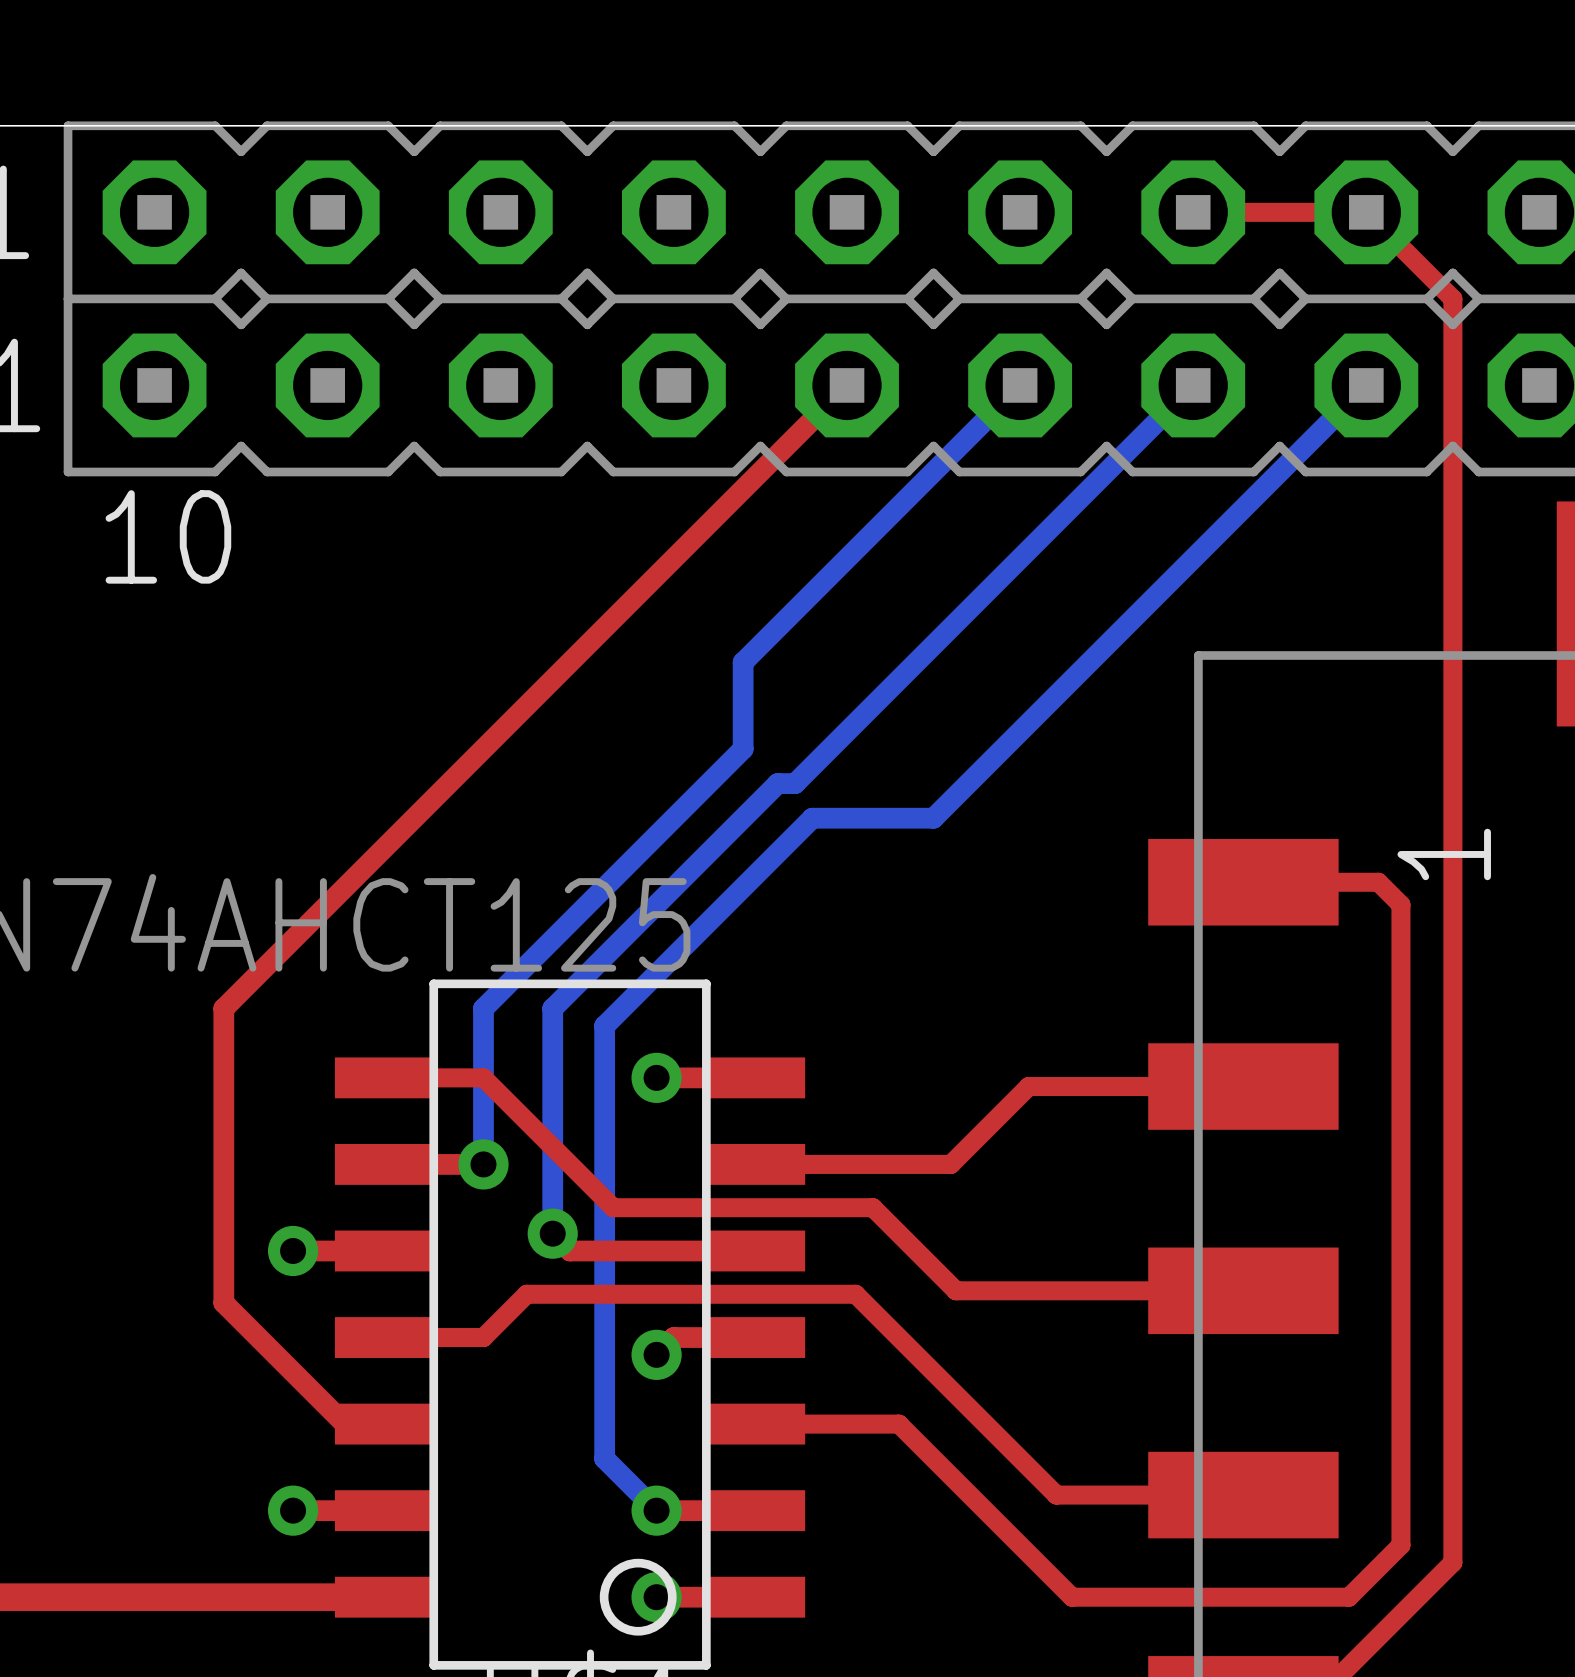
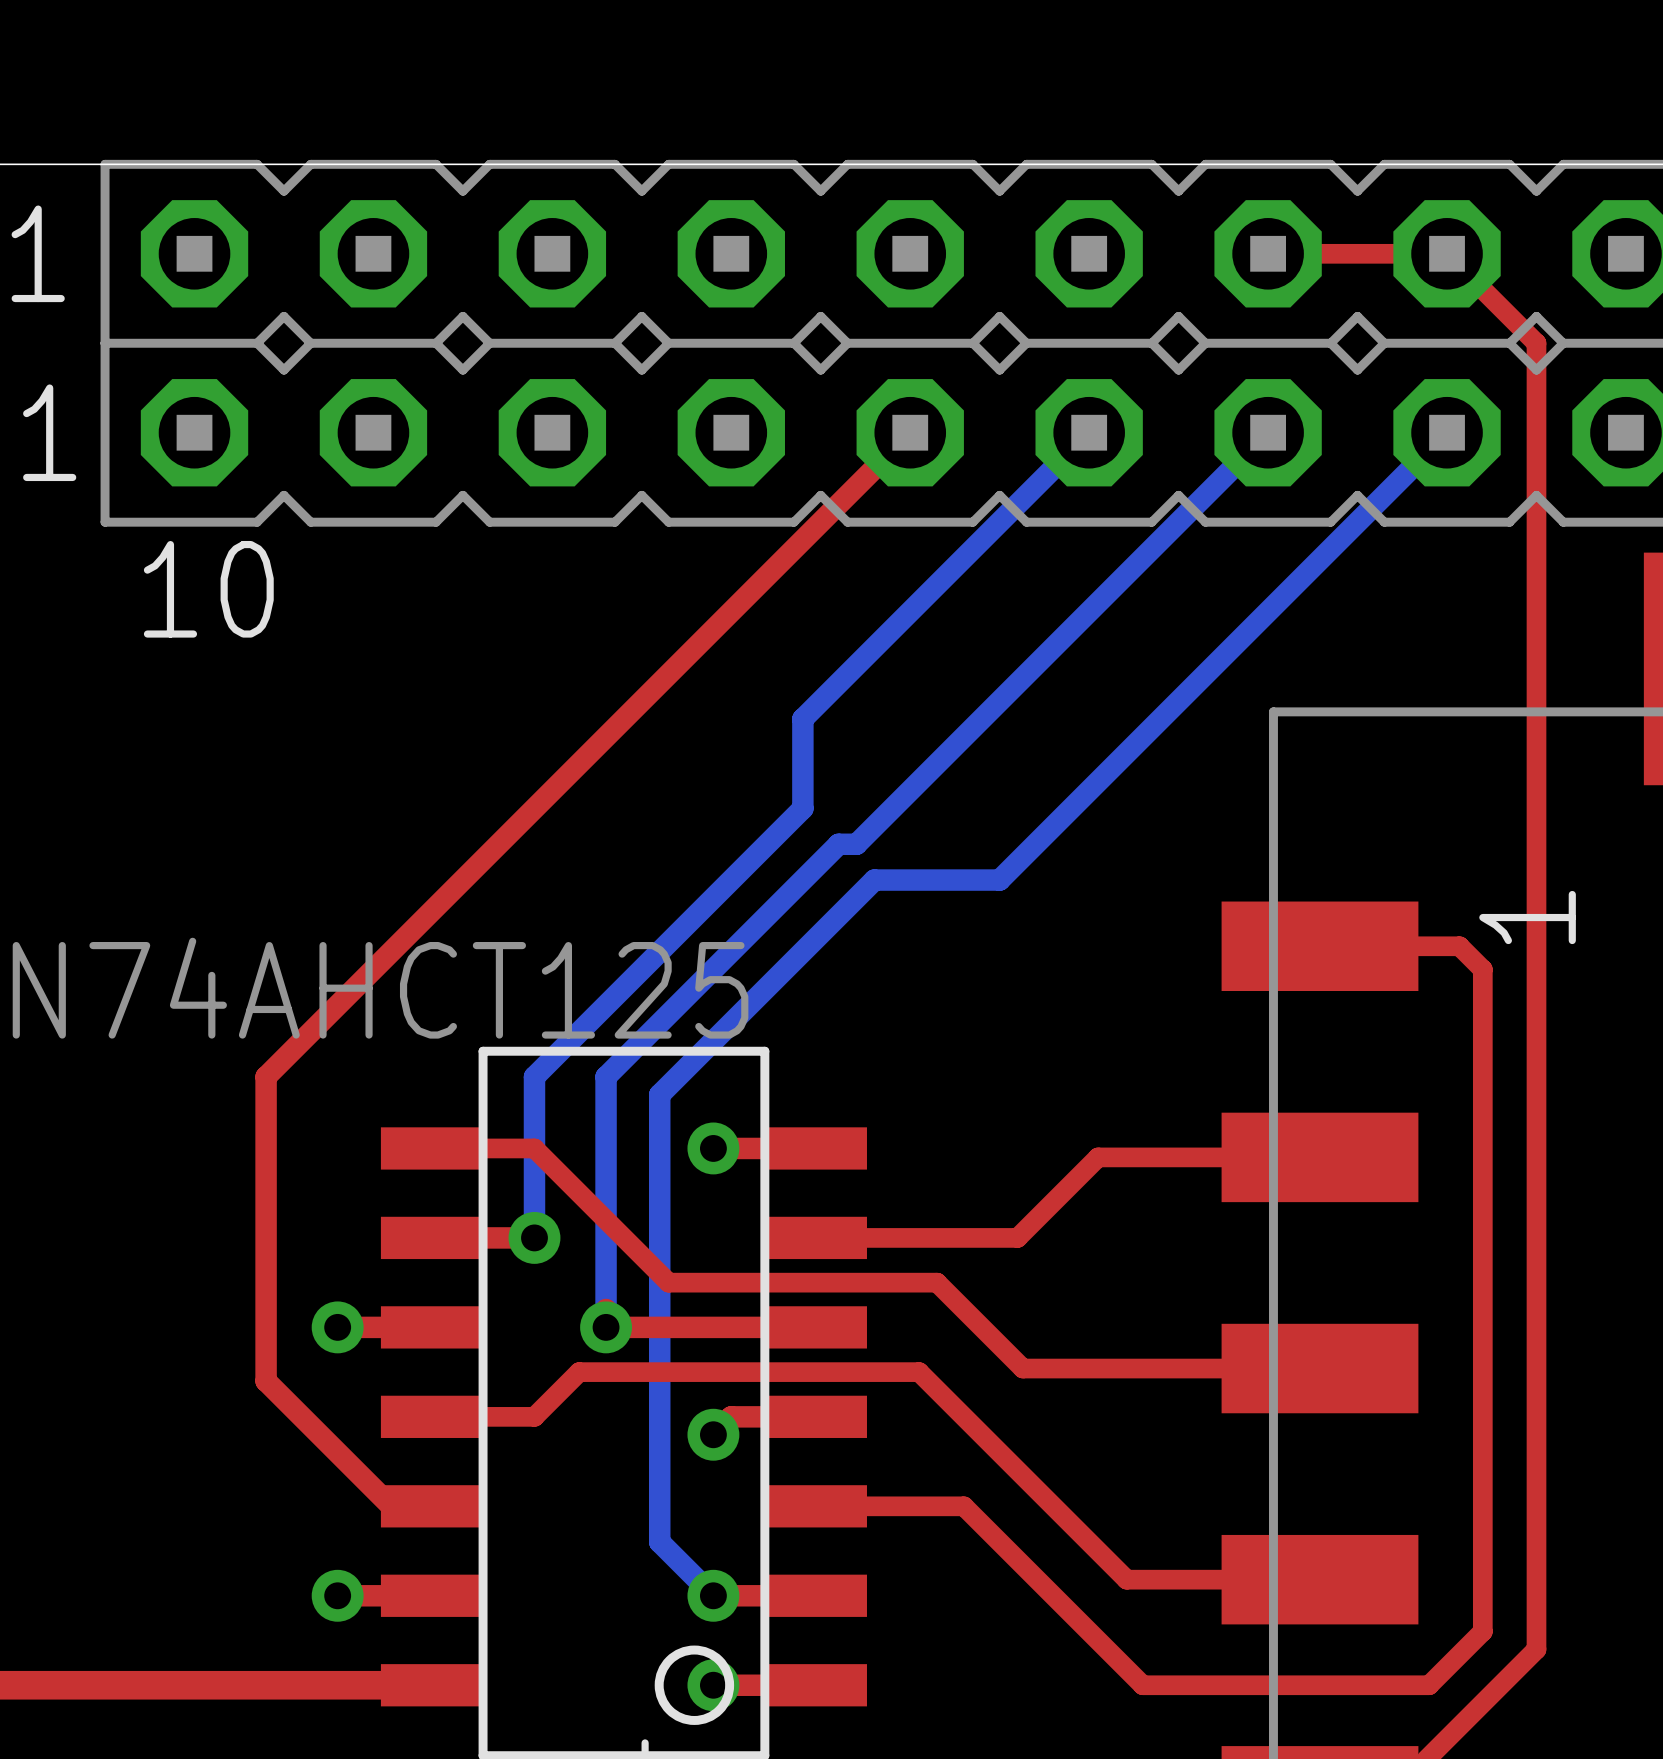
via position: (552, 1233) -> (606, 1327)

